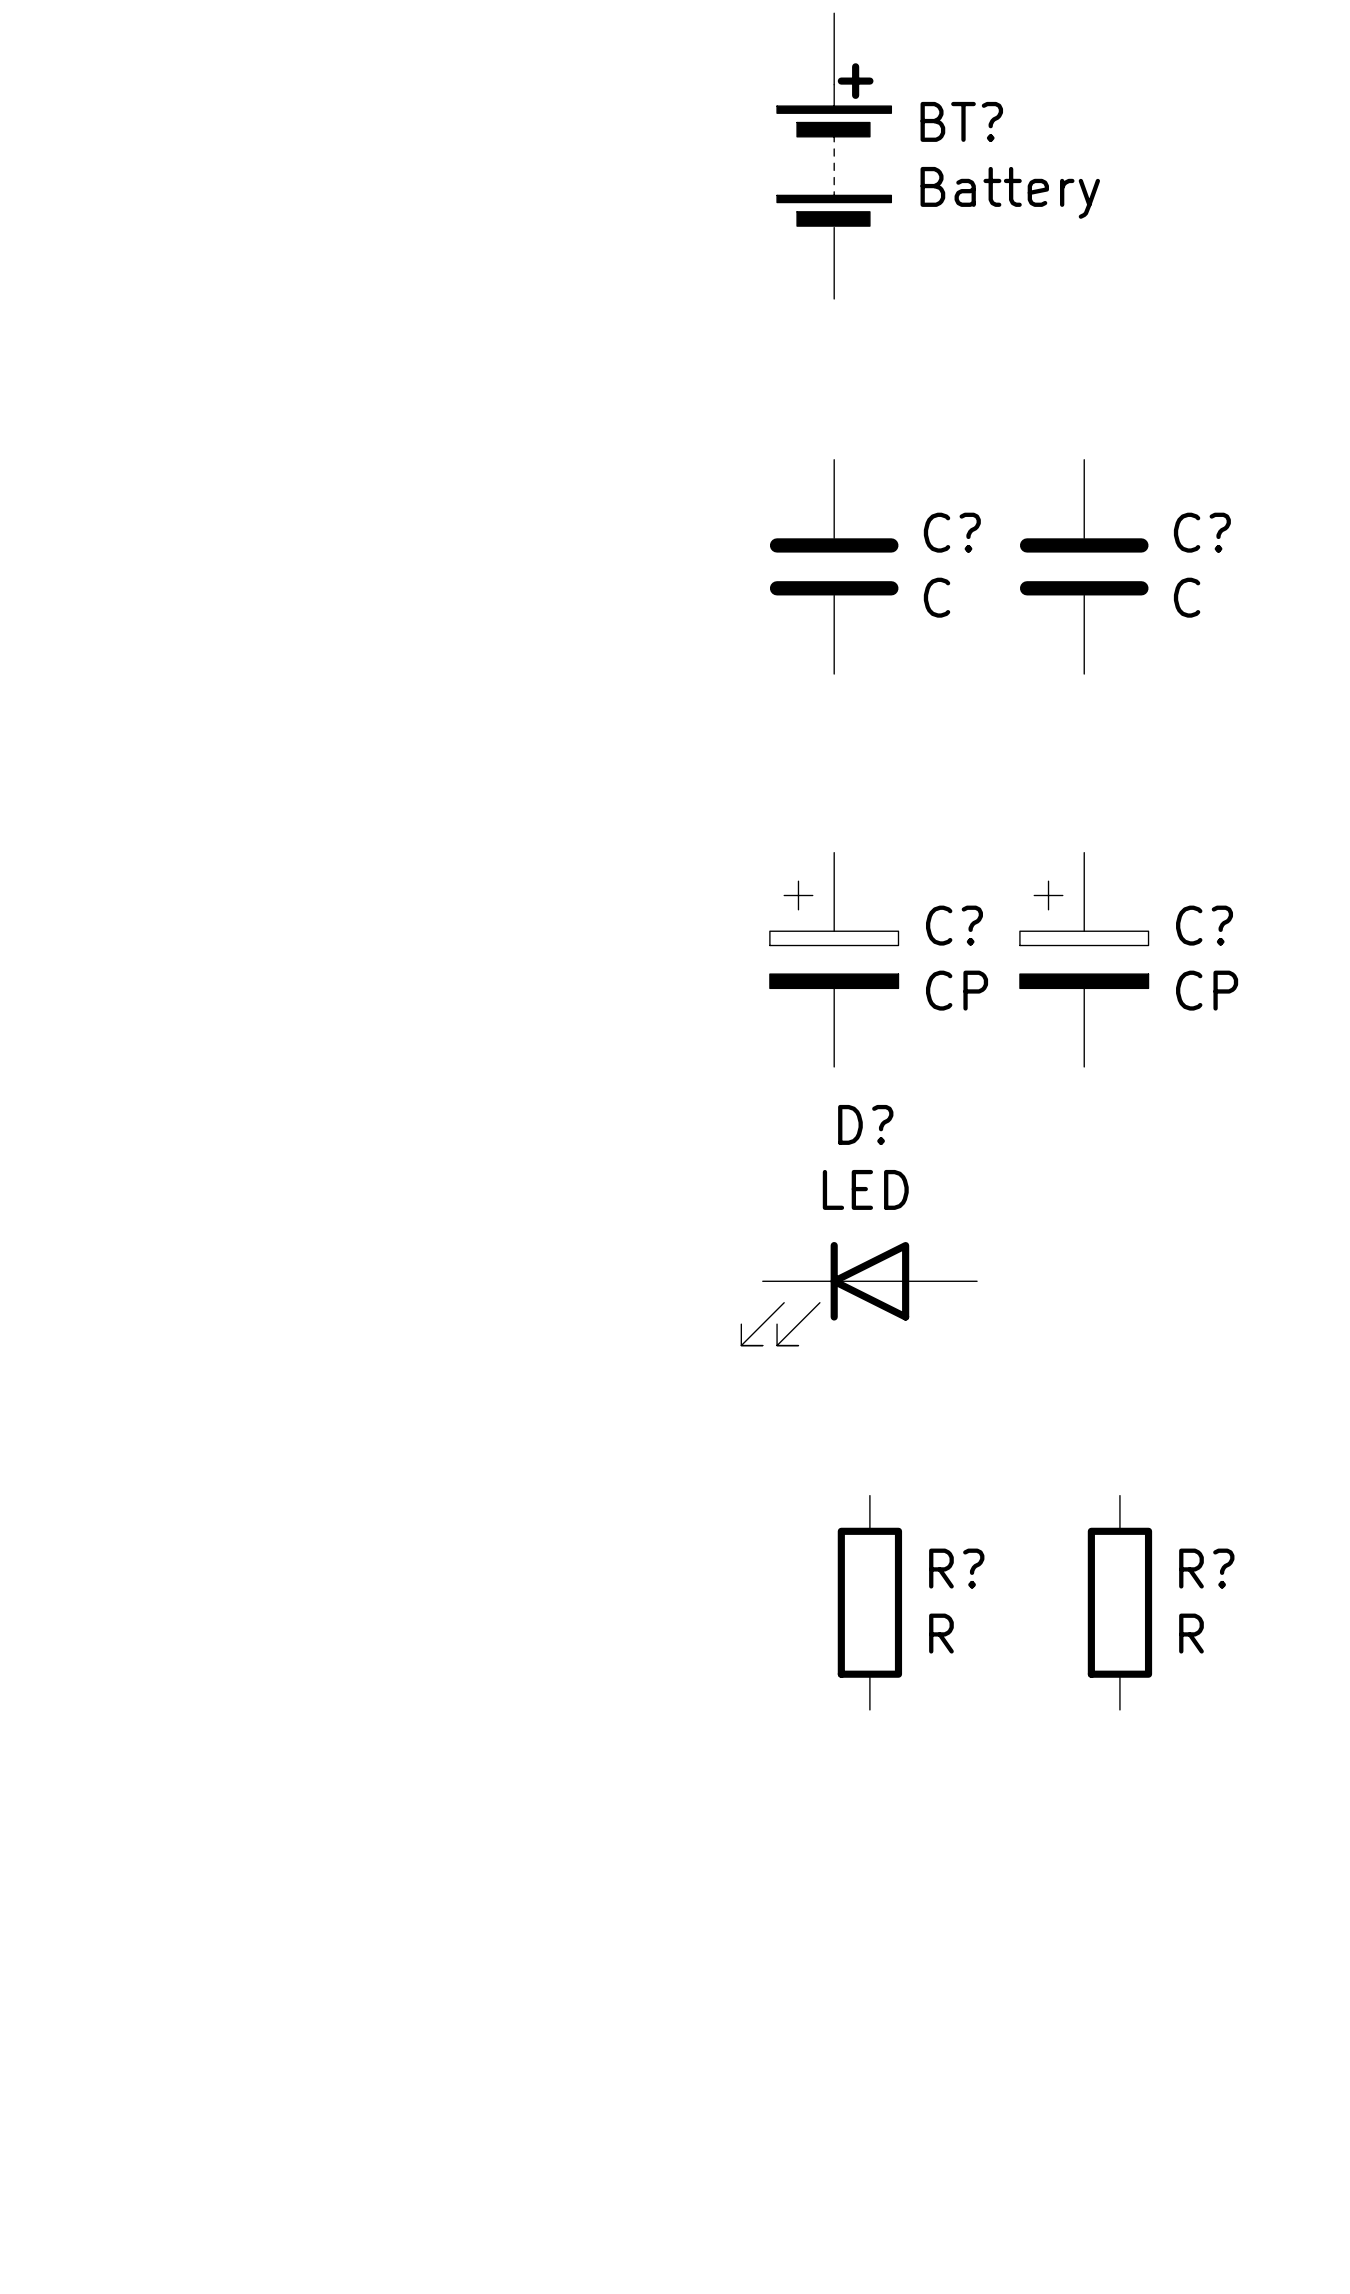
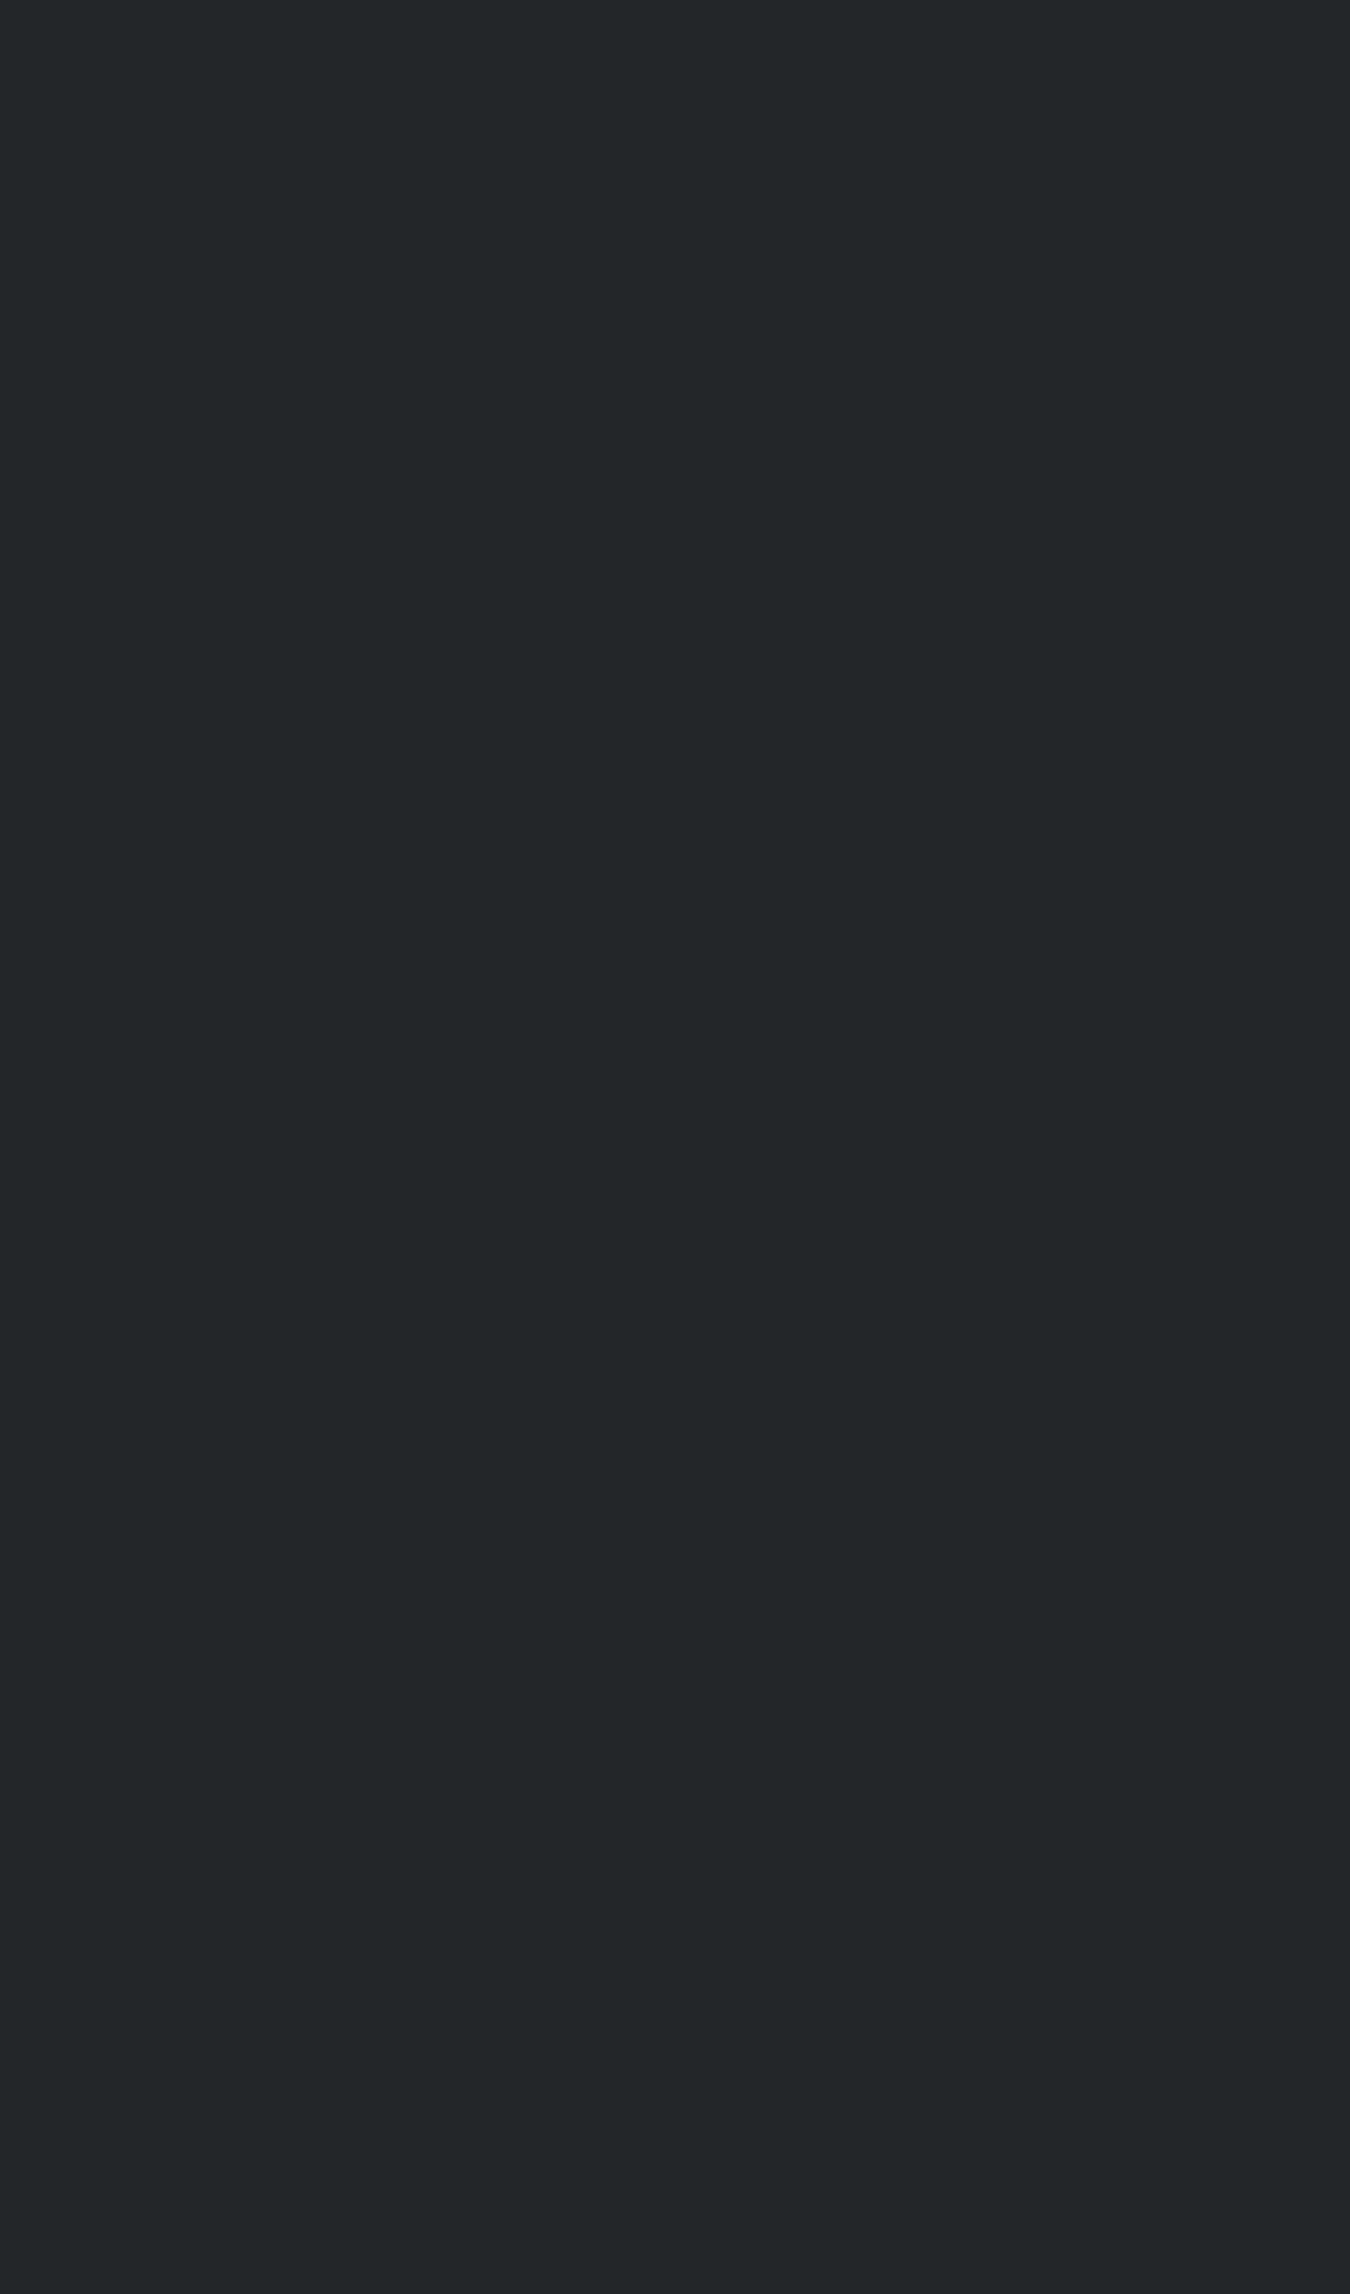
BT?: Battery (834, 156) -> none
C?: C (834, 566) -> none
C?: C (1084, 566) -> none
C?: CP (834, 959) -> none
C?: CP (1084, 959) -> none
D?: LED (859, 1293) -> none
R?: R (869, 1602) -> none
R?: R (1119, 1602) -> none

